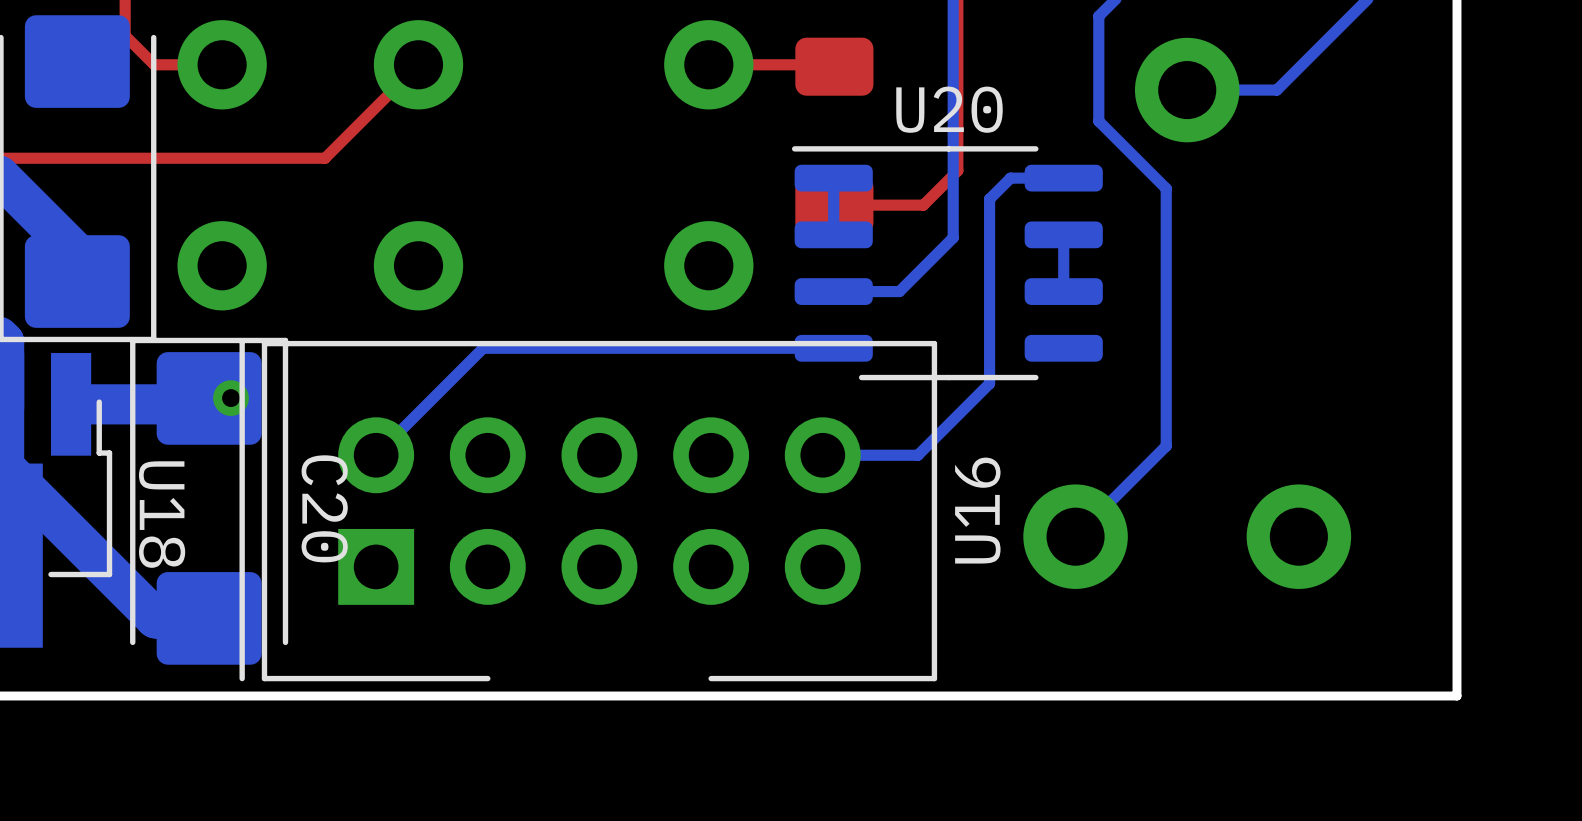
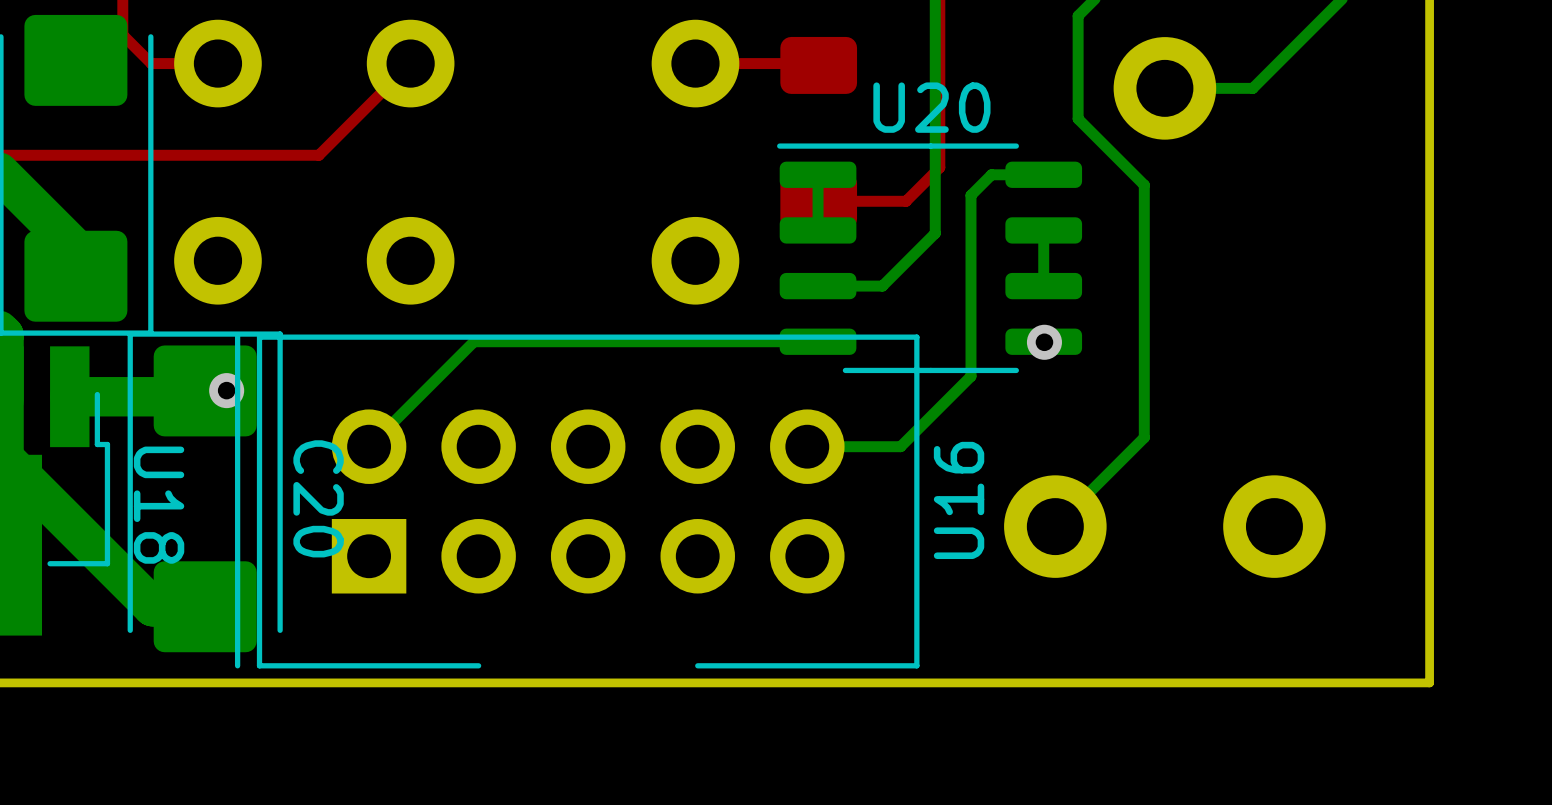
via: none -> (1044, 342)

